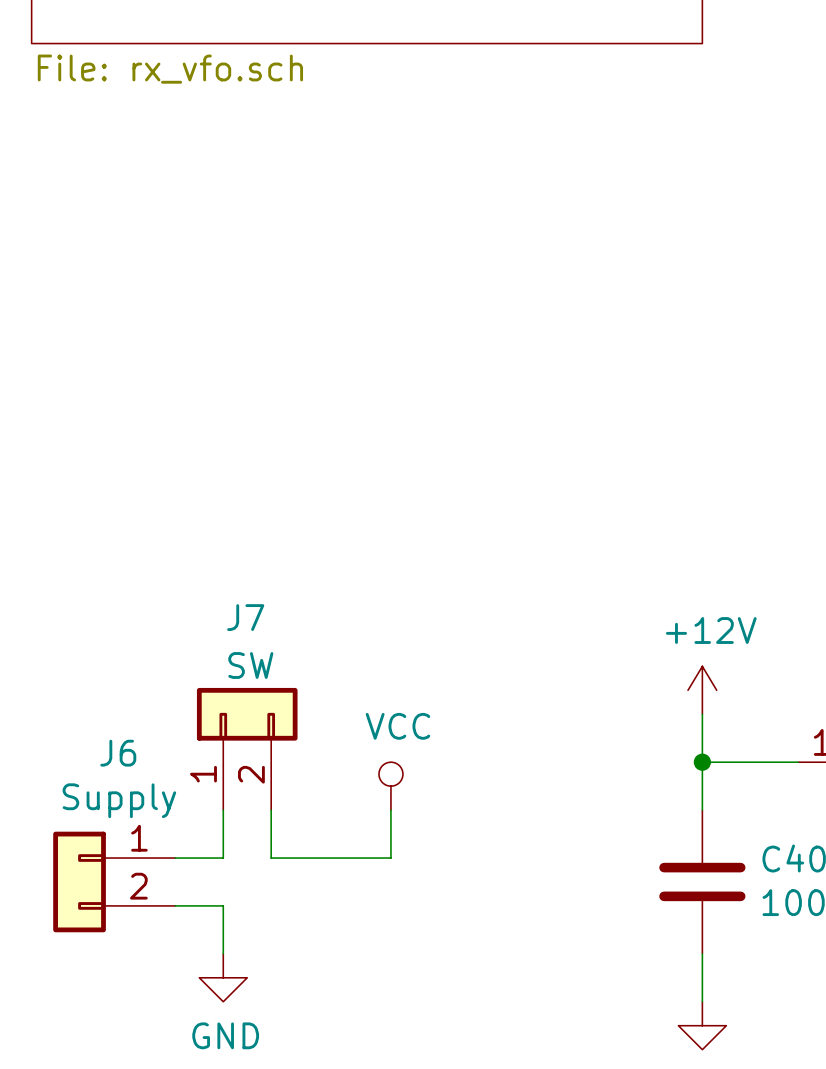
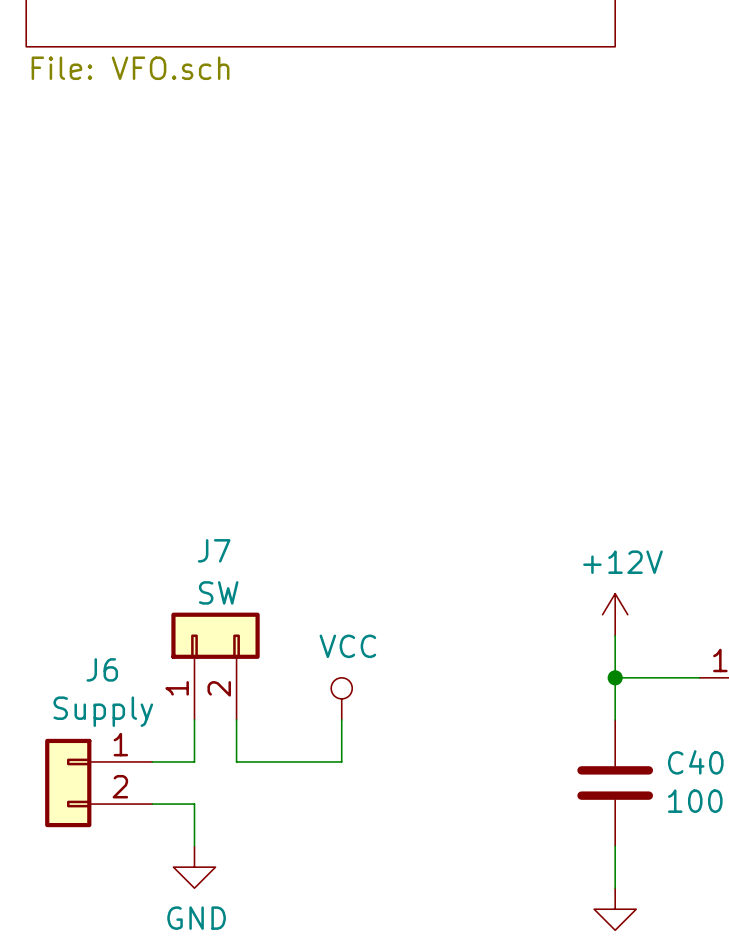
sheet value: File: rx_vfo.sch (170, 69) -> File: VFO.sch (130, 68)

